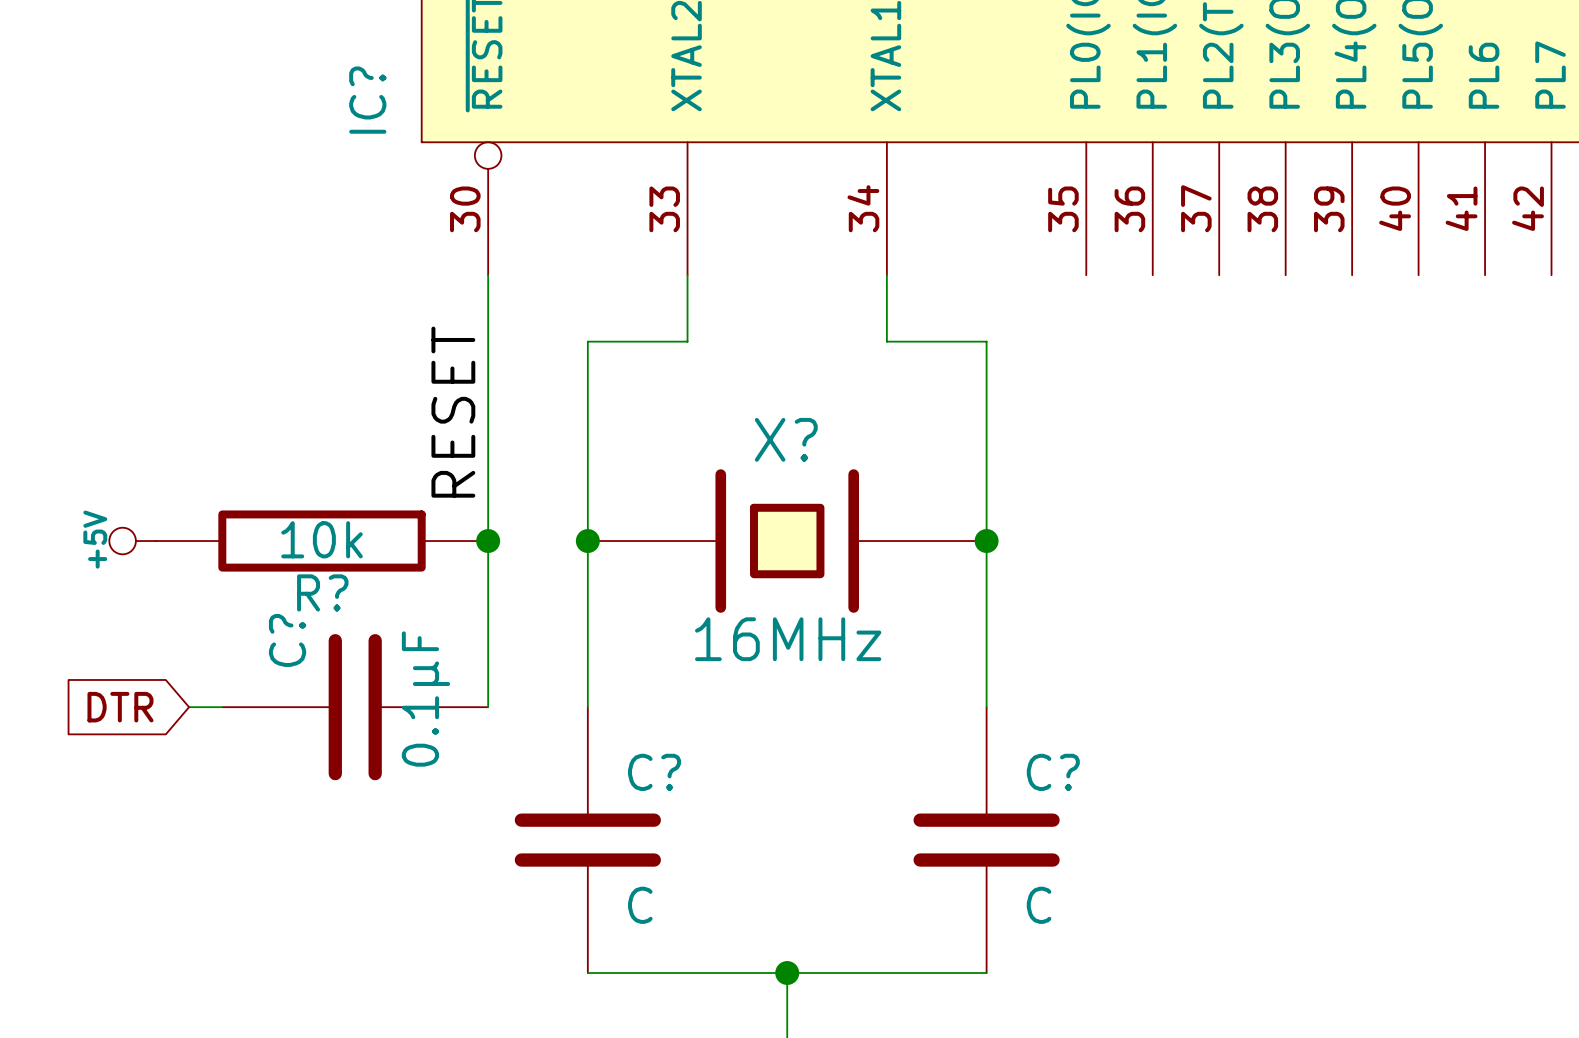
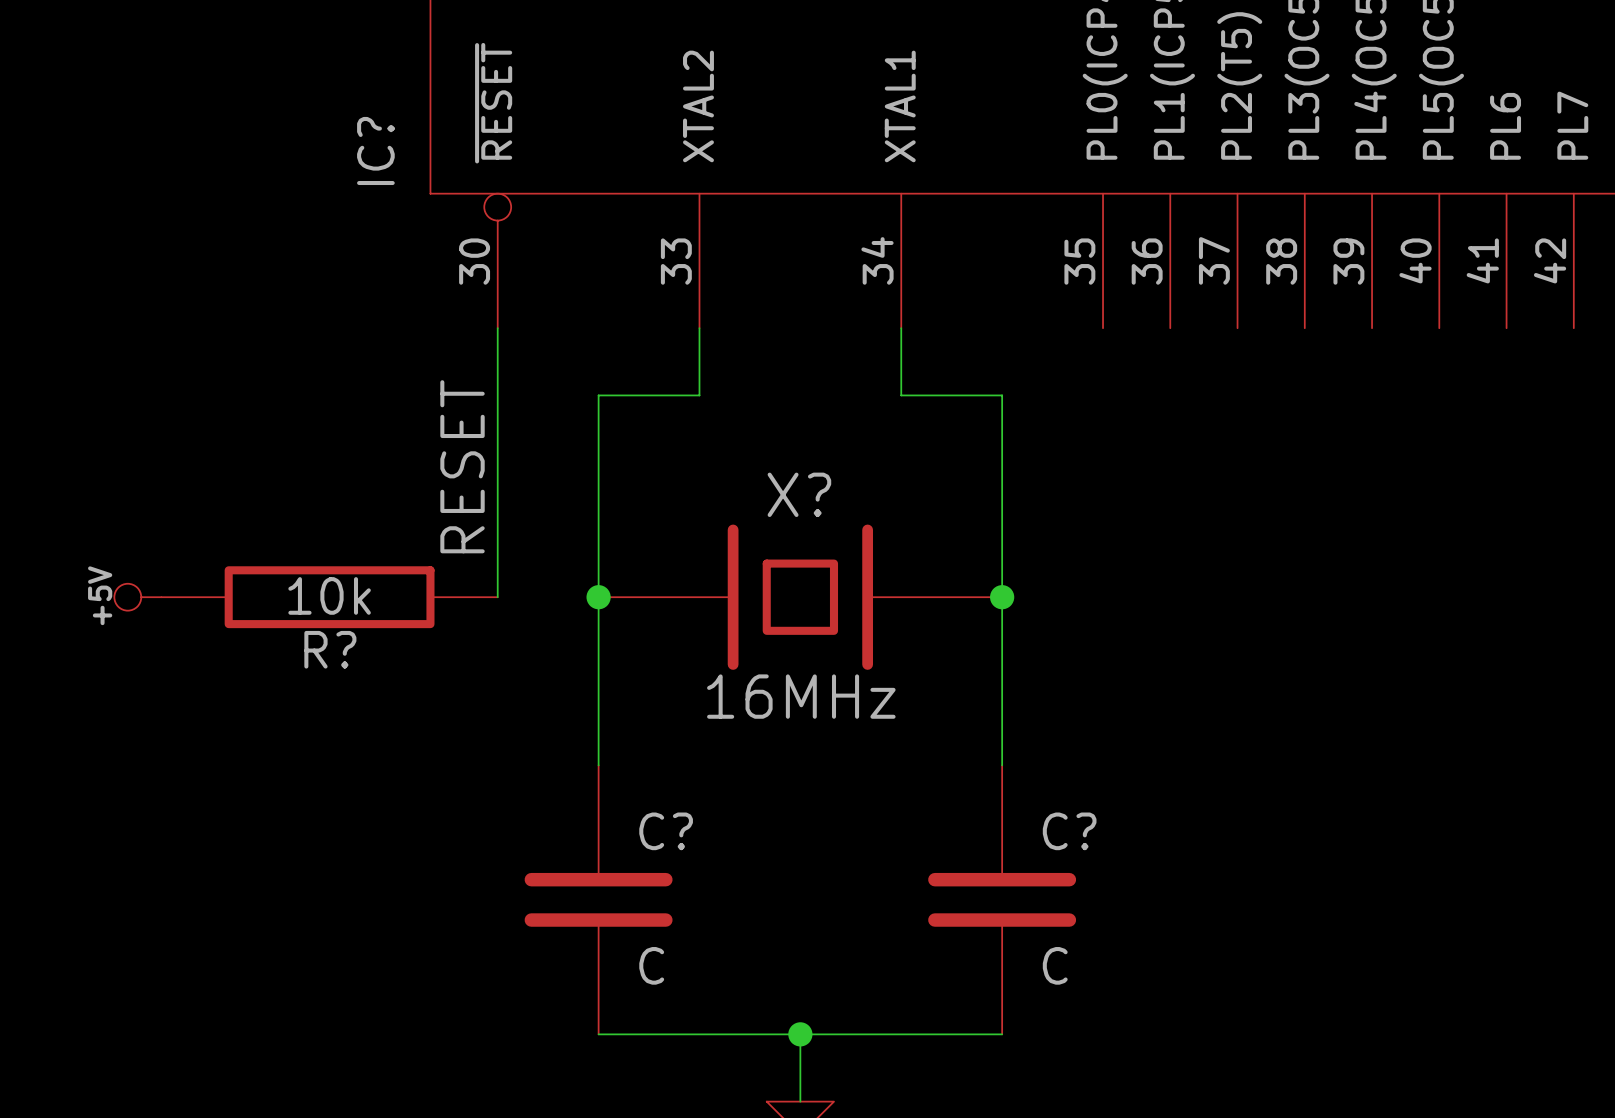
wire: (488, 541) (488, 707) -> none
junction: (488, 541) -> none
global label: DTR (120, 707) -> none
wire: (189, 707) (222, 707) -> none
C?: 0.1µF (355, 707) -> none

